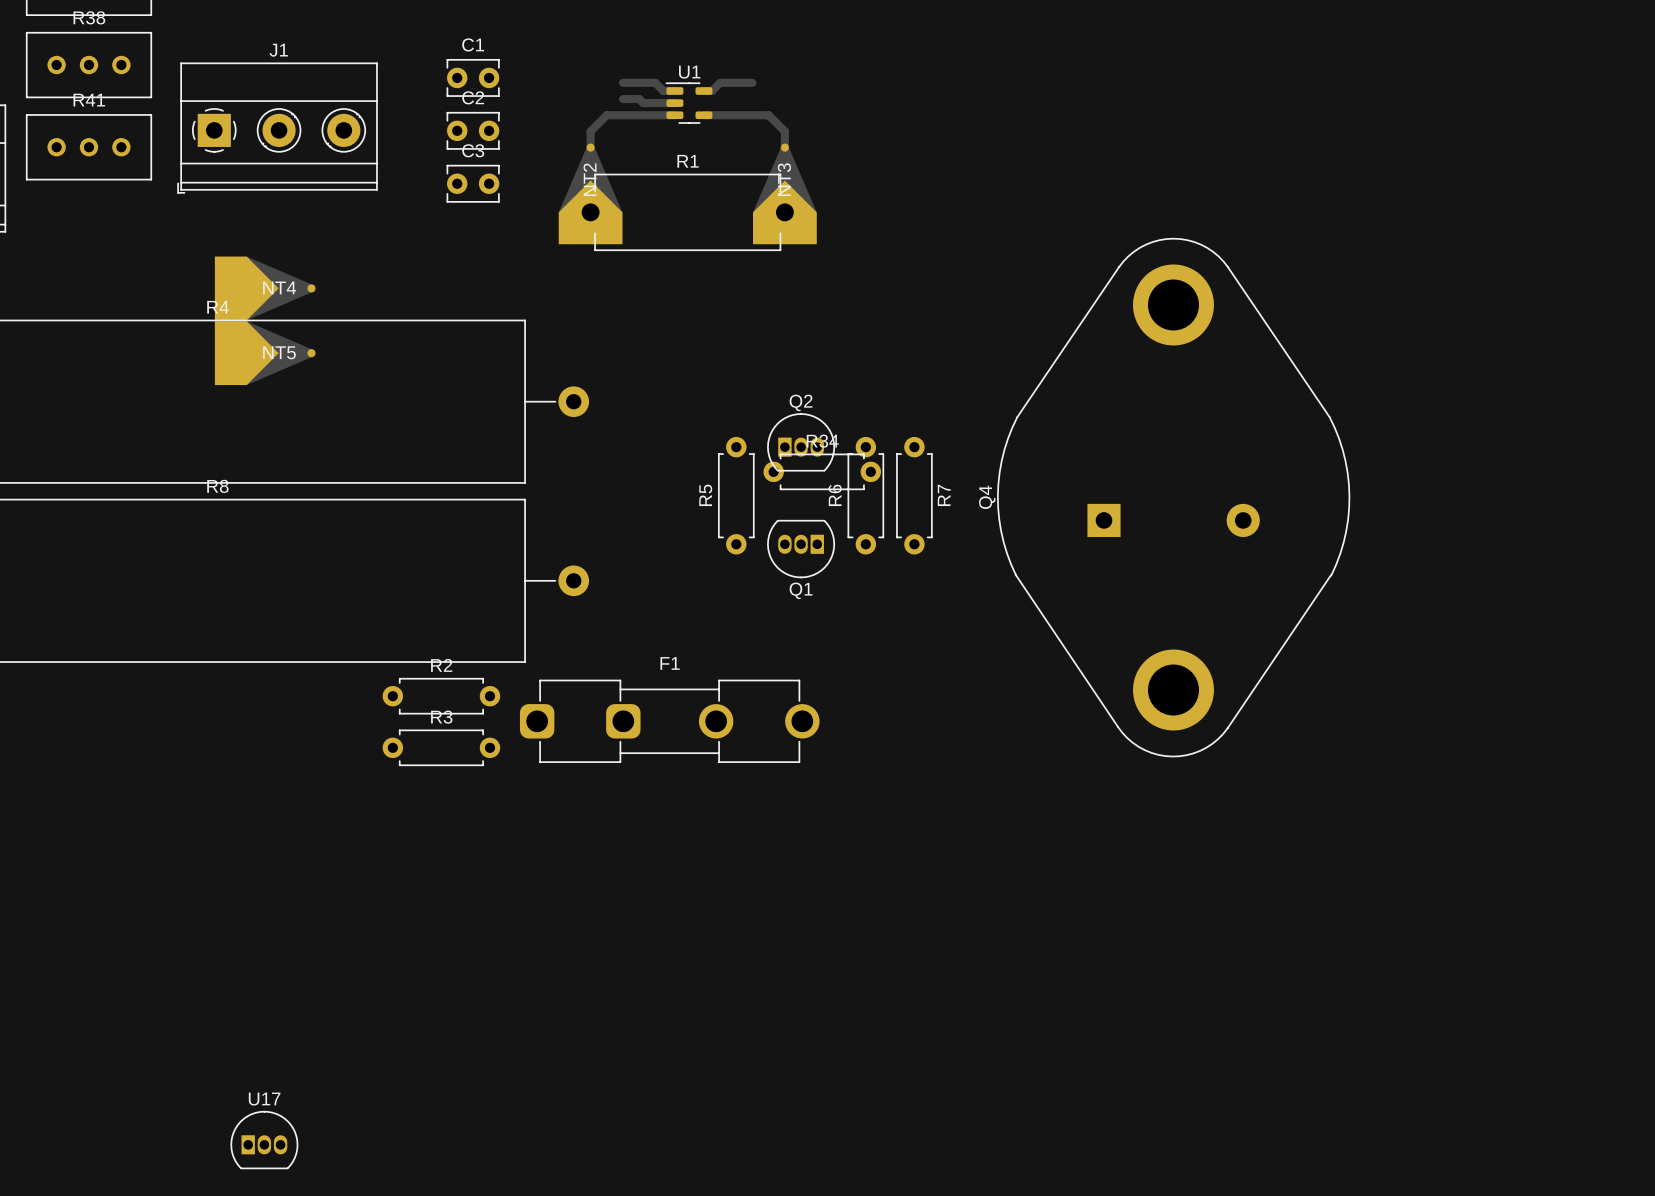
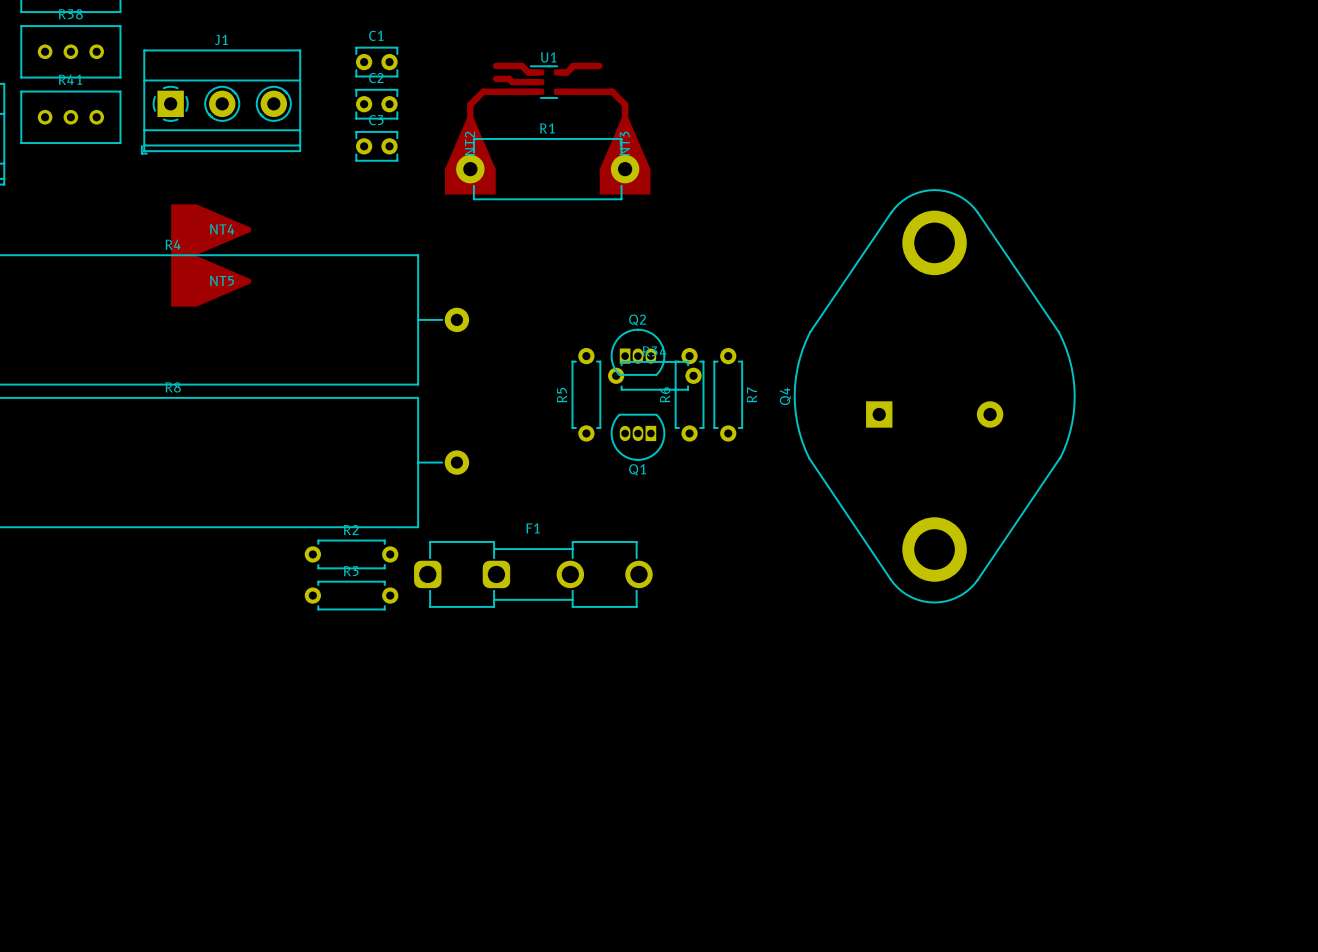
U17: (264, 1140) -> none

